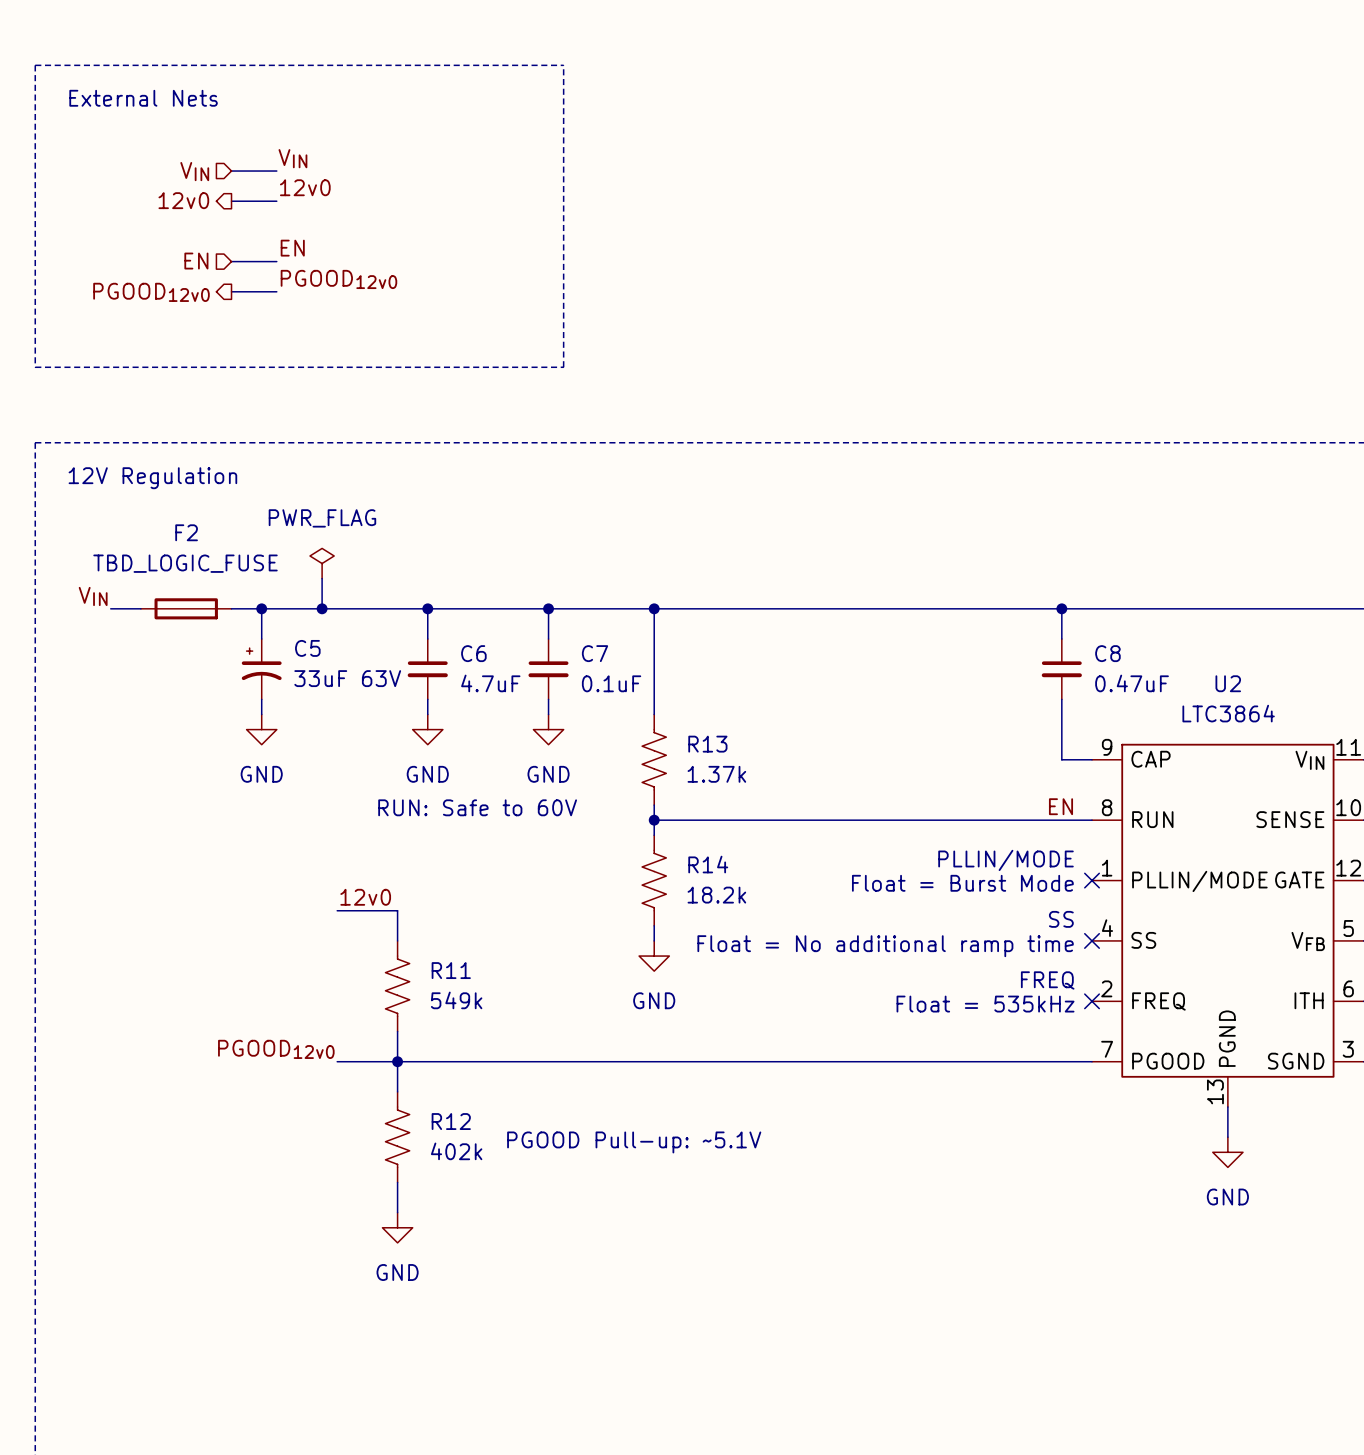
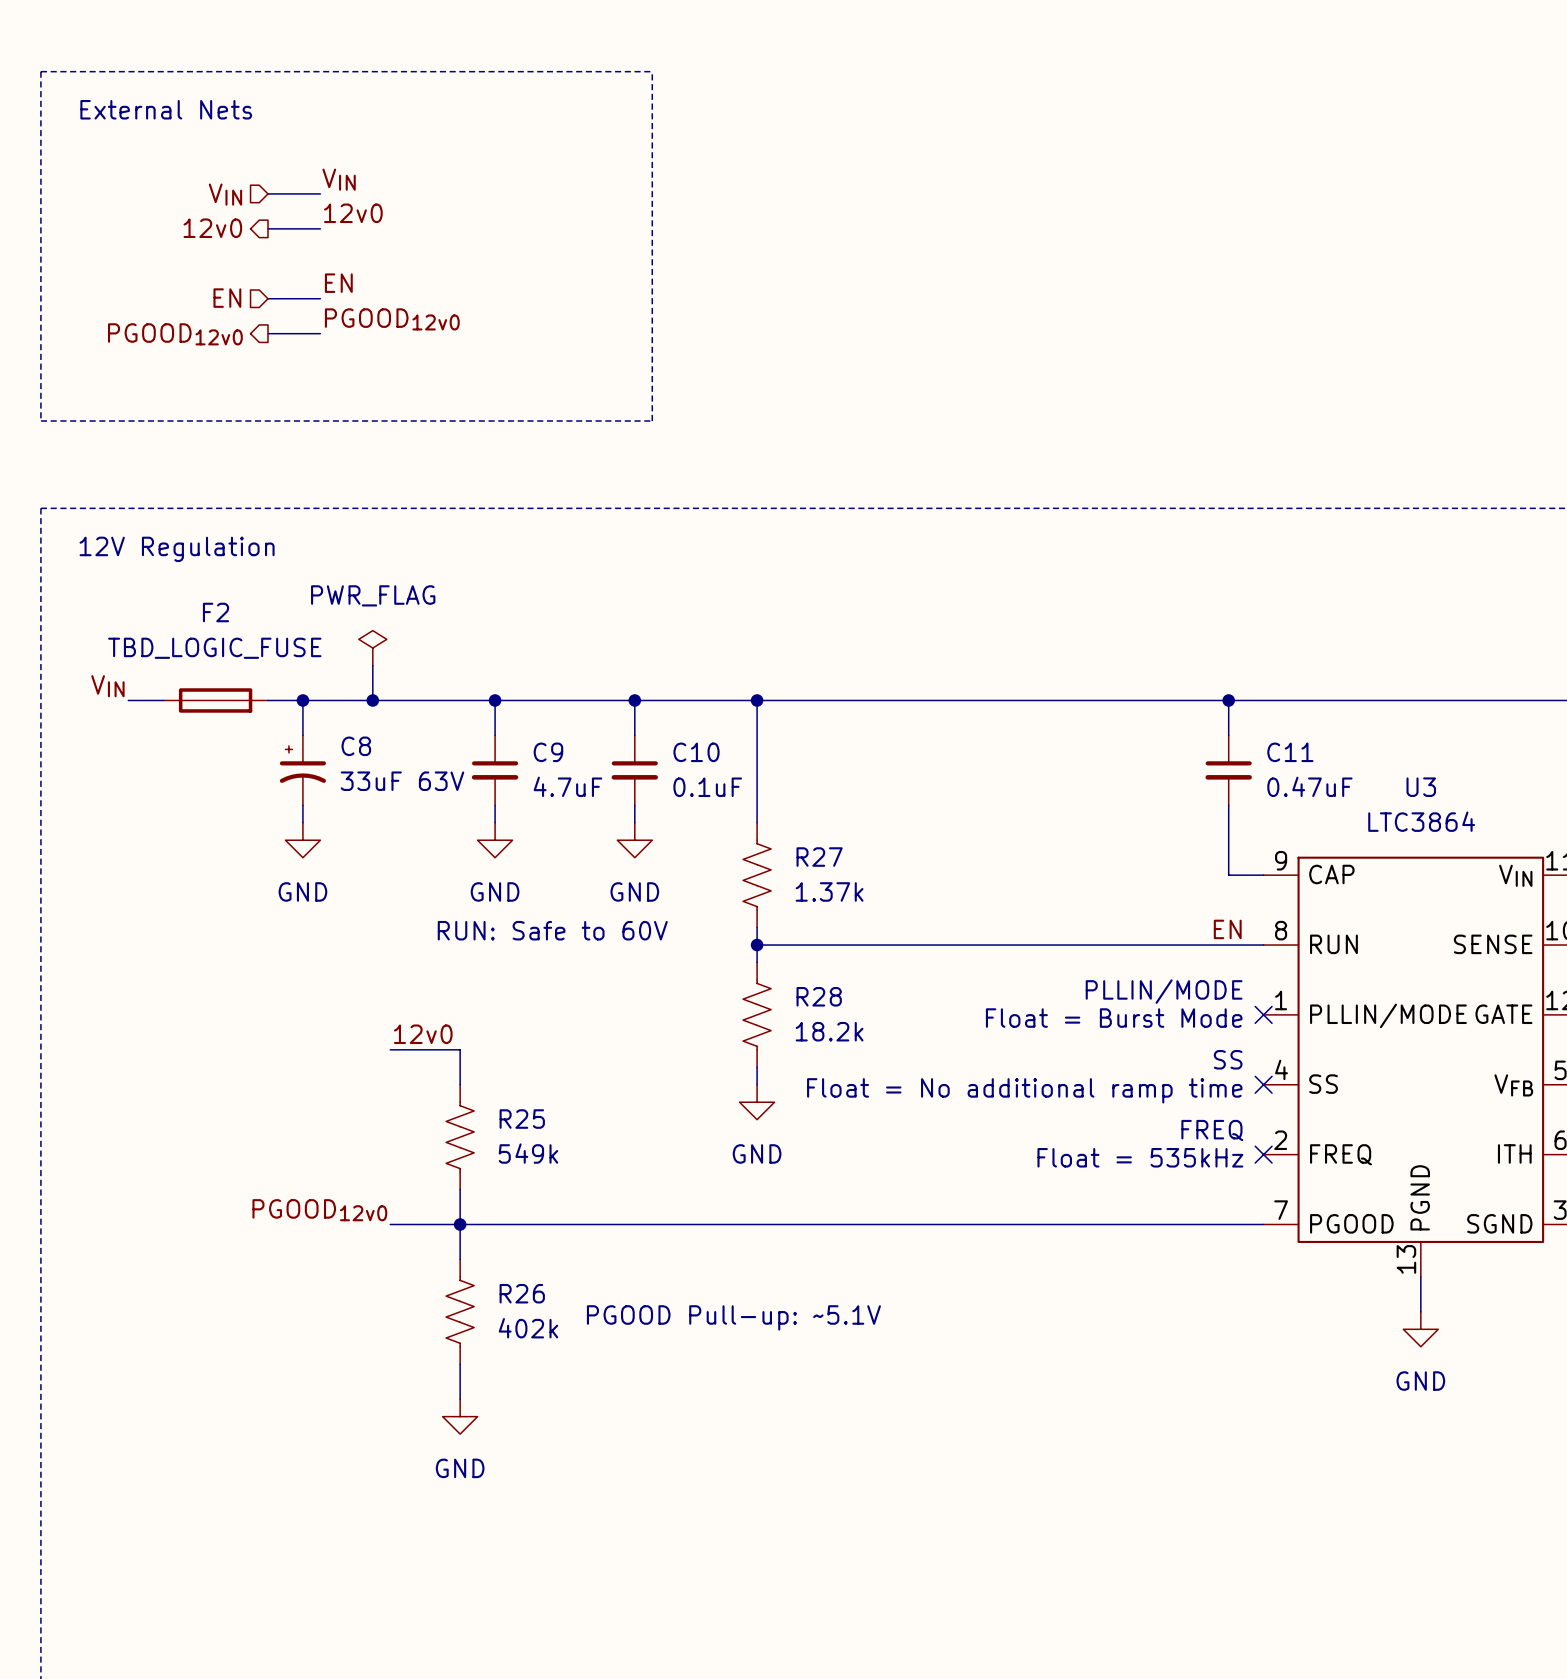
C5 name: C5 (307, 648) -> C8 (356, 746)
C6 name: C6 (473, 653) -> C9 (548, 752)
C7 name: C7 (595, 653) -> C10 (696, 752)
C8 name: C8 (1107, 653) -> C11 (1290, 752)
U2 name: U2 (1228, 683) -> U3 (1421, 787)
R13 name: R13 (707, 744) -> R27 (819, 857)
R14 name: R14 (708, 864) -> R28 (819, 996)
R11 name: R11 (451, 970) -> R25 (522, 1119)
R12 name: R12 (451, 1121) -> R26 (522, 1293)

